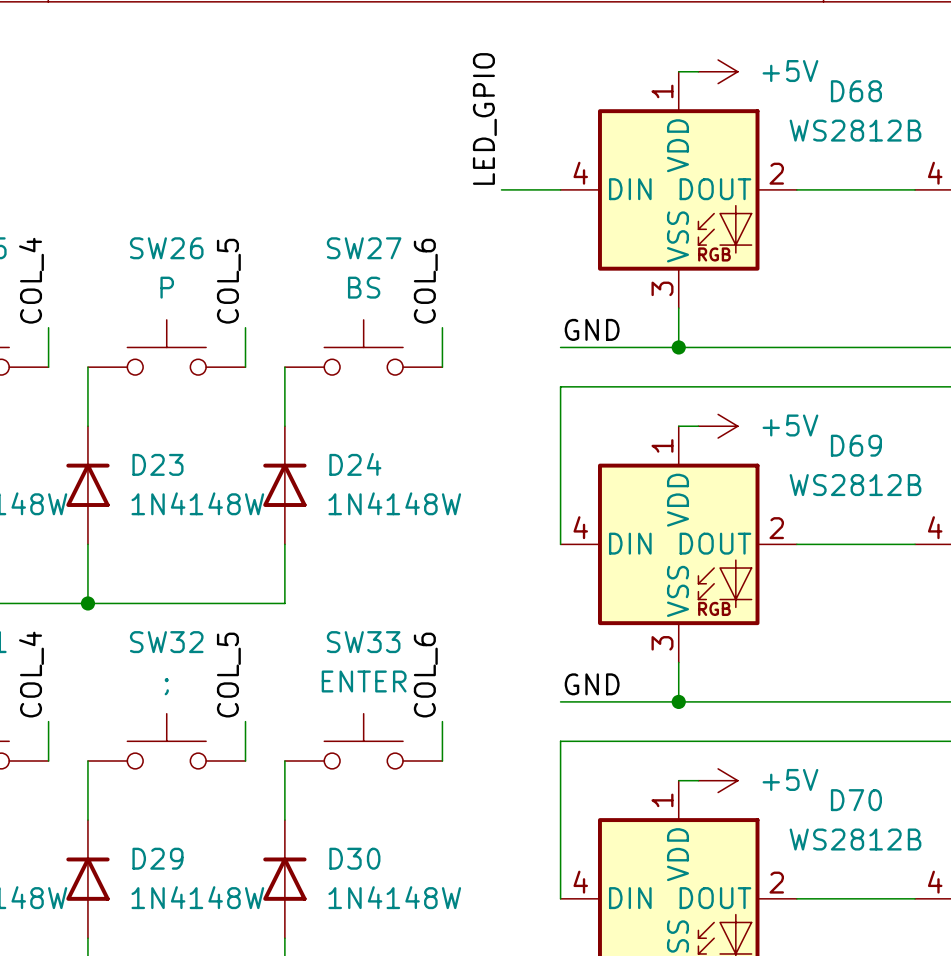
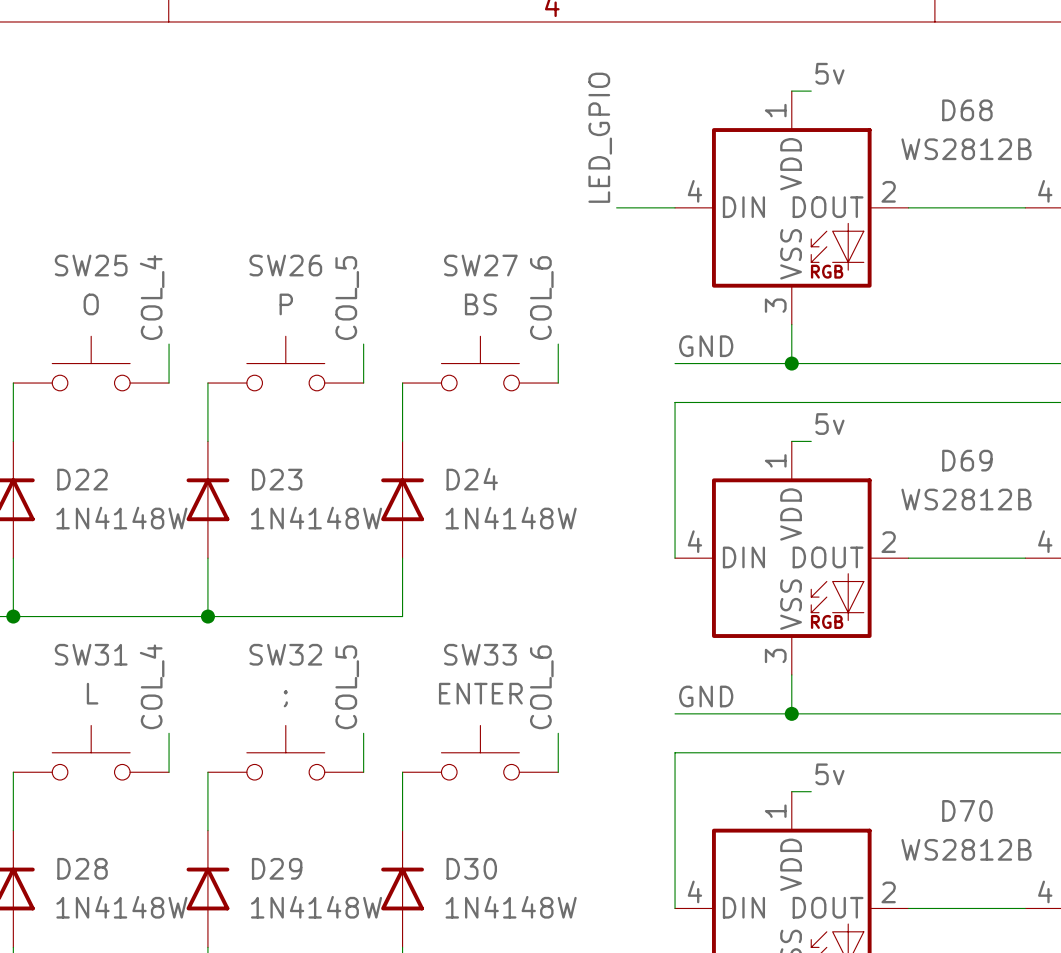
label: none -> 5v (829, 73)
power symbol: +5V (718, 71) -> none
label: none -> 5v (829, 424)
power symbol: +5V (718, 426) -> none
label: none -> 5v (829, 774)
power symbol: +5V (718, 780) -> none

